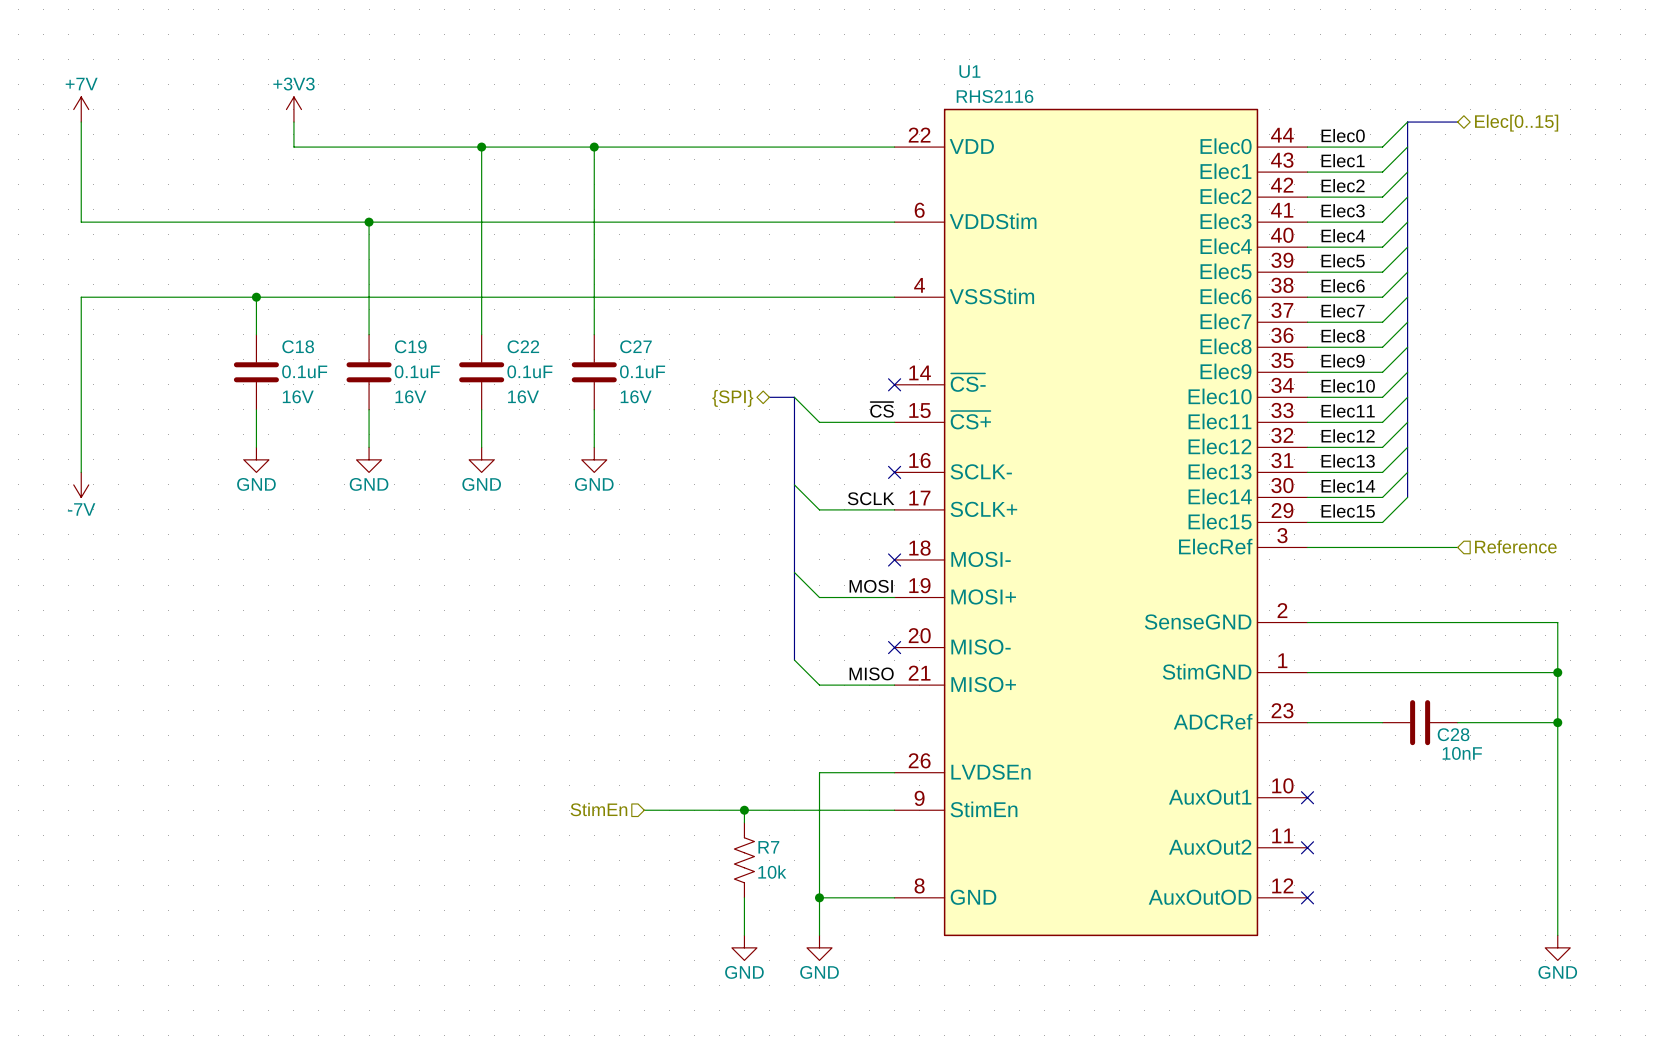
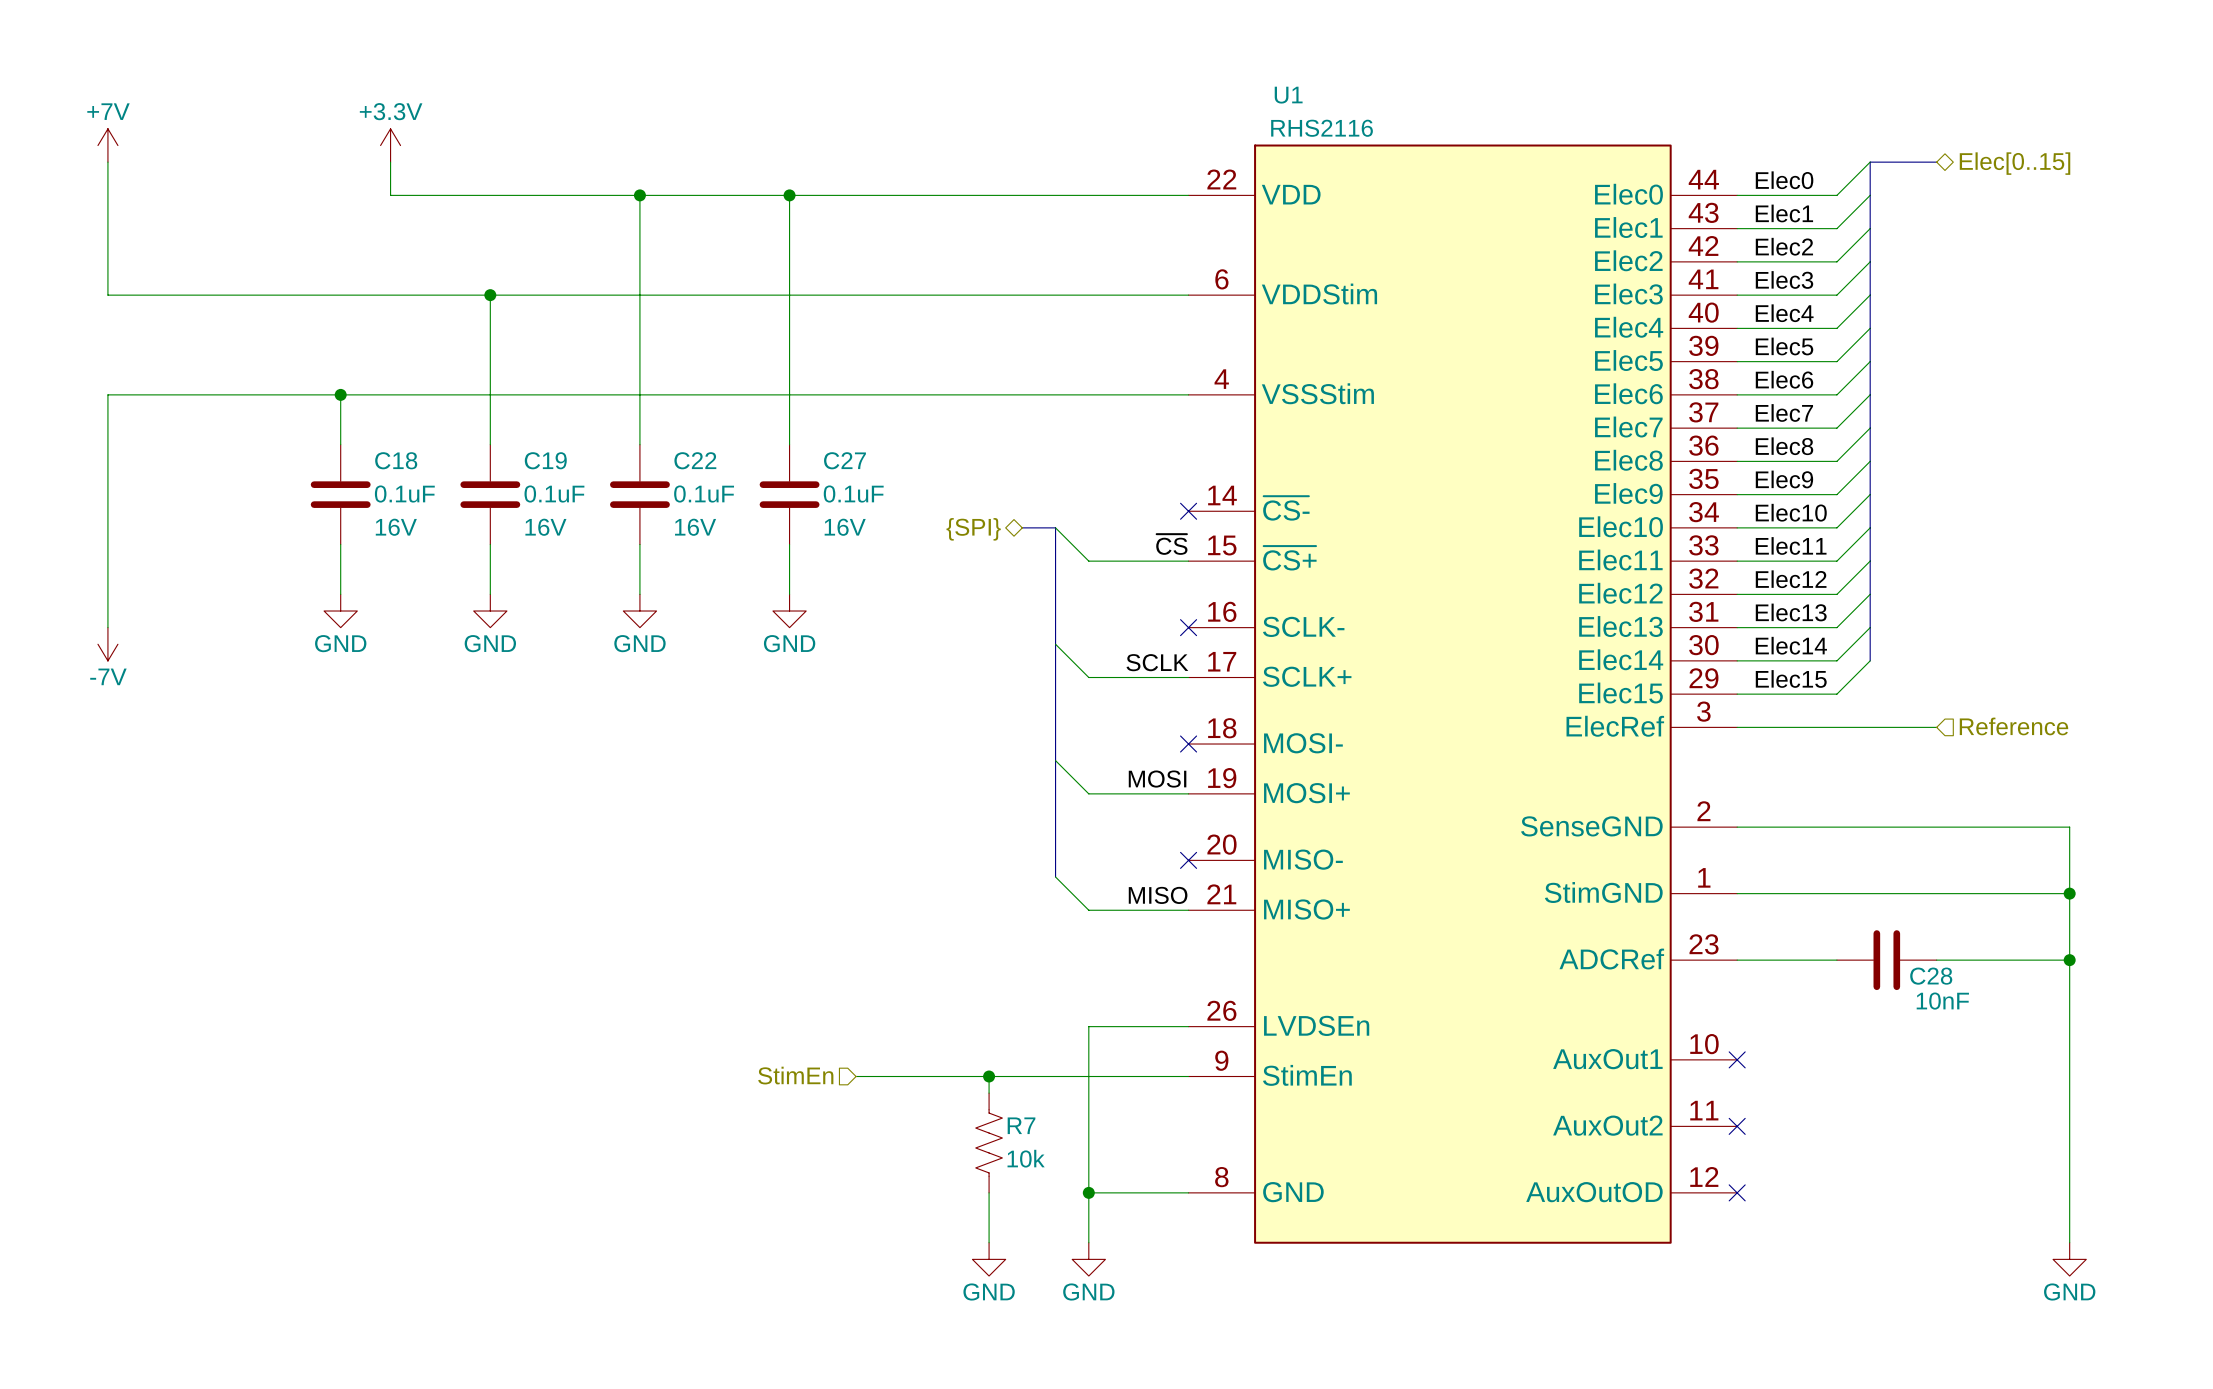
power symbol: +3V3 (293, 109) -> +3.3V (390, 145)

